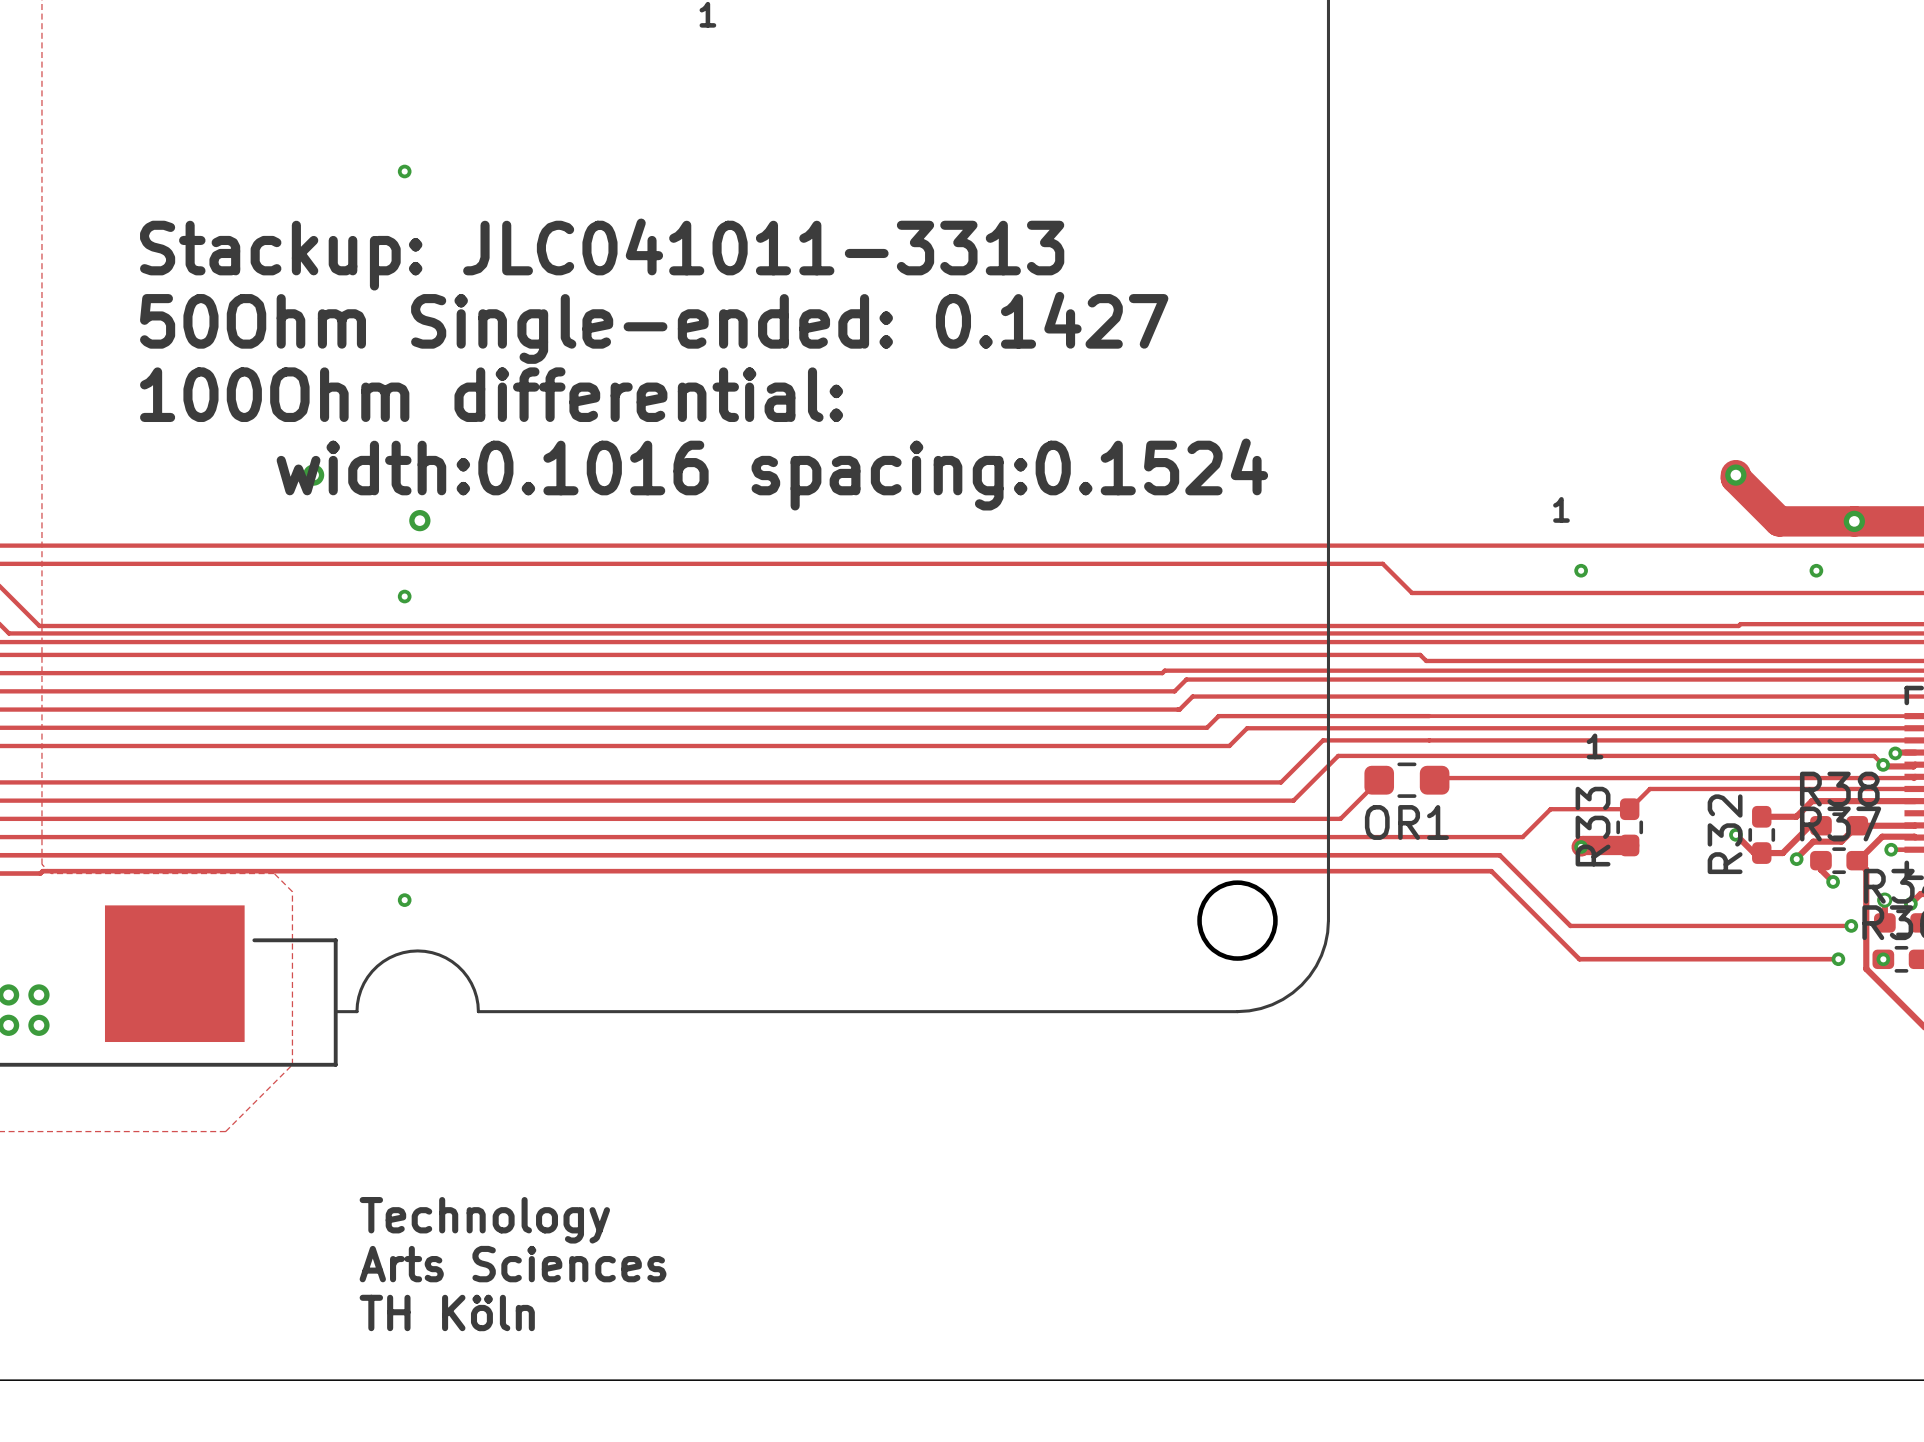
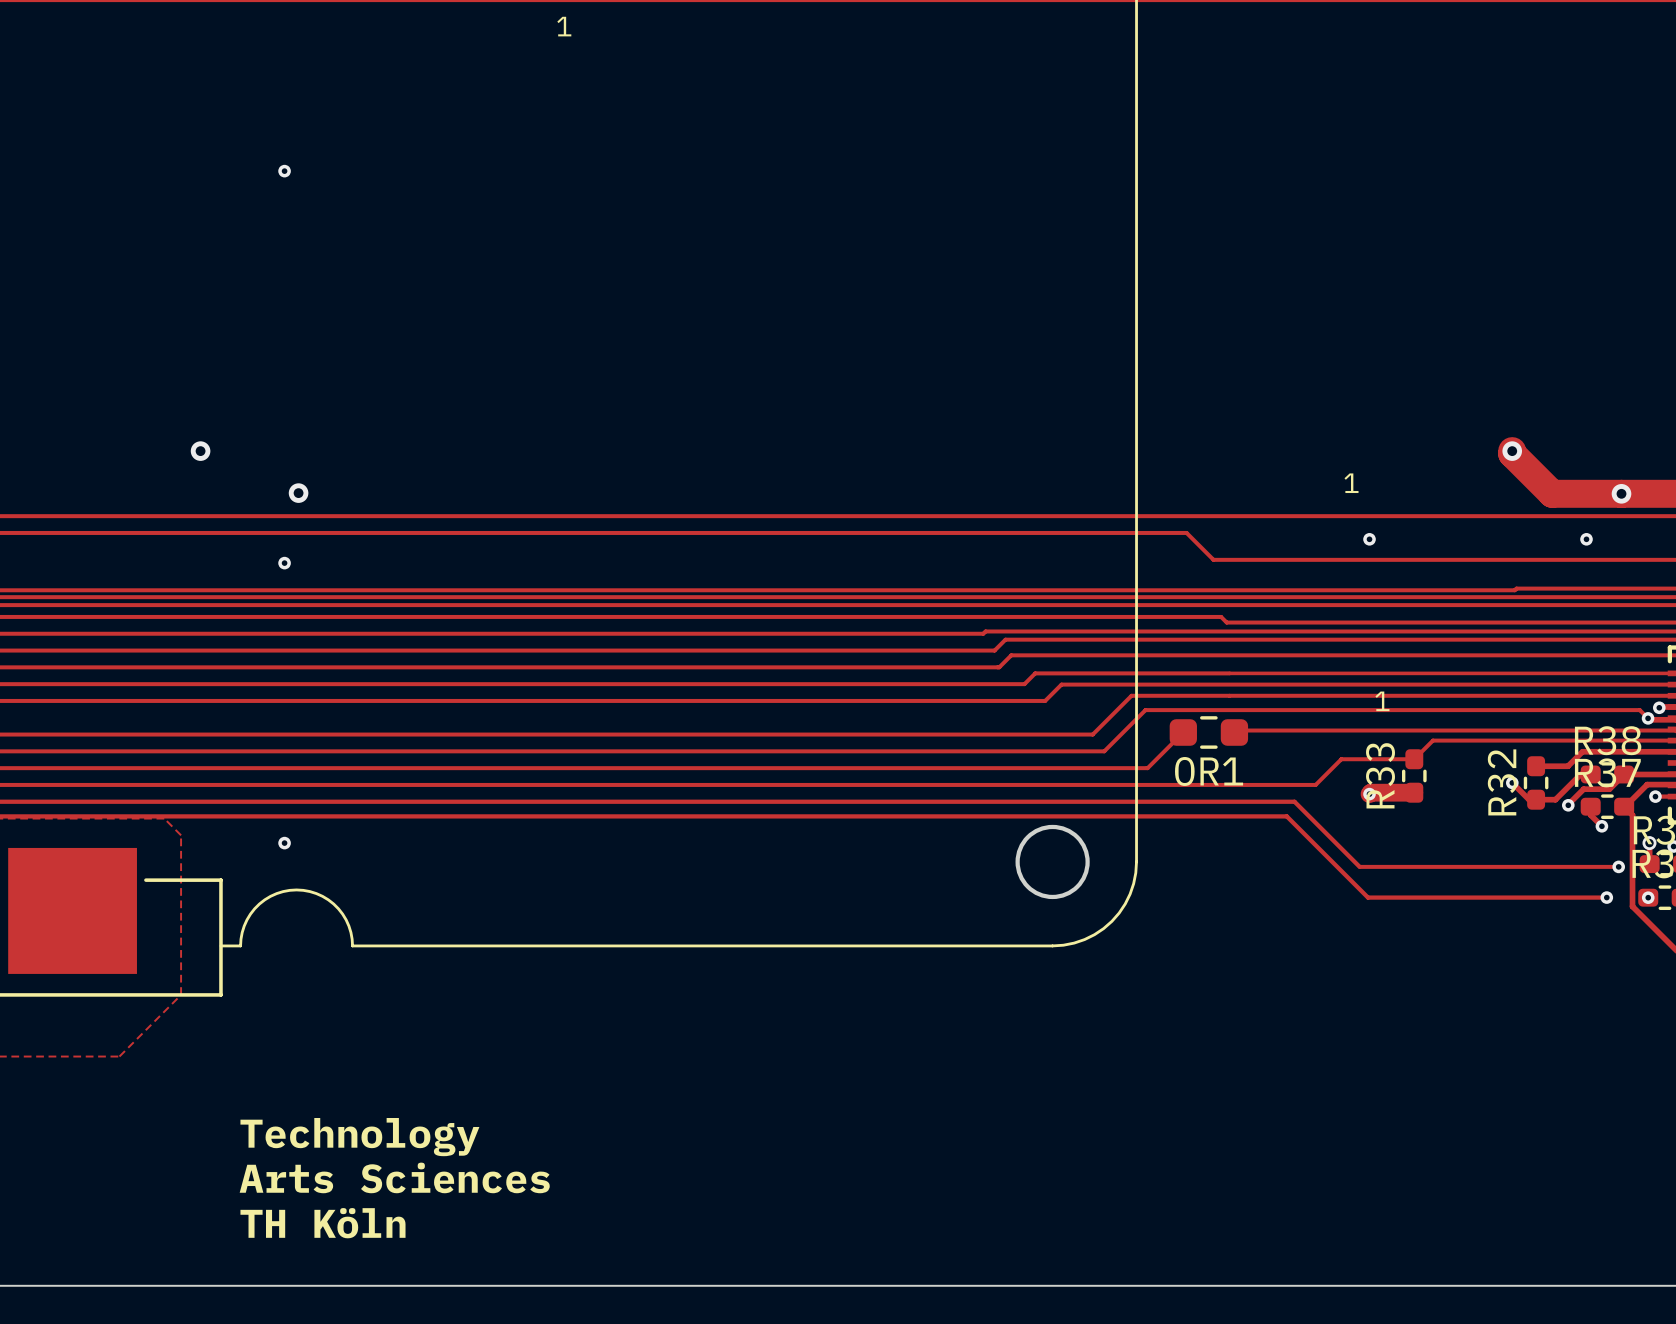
text: Stackup: JLC041011-3313 (602, 254) -> none
text: 50Ohm Single-ended: 0.1427 (654, 327) -> none
text: 100Ohm differential: (491, 394) -> none
text: width:0.1016 spacing:0.1524 (772, 474) -> none

